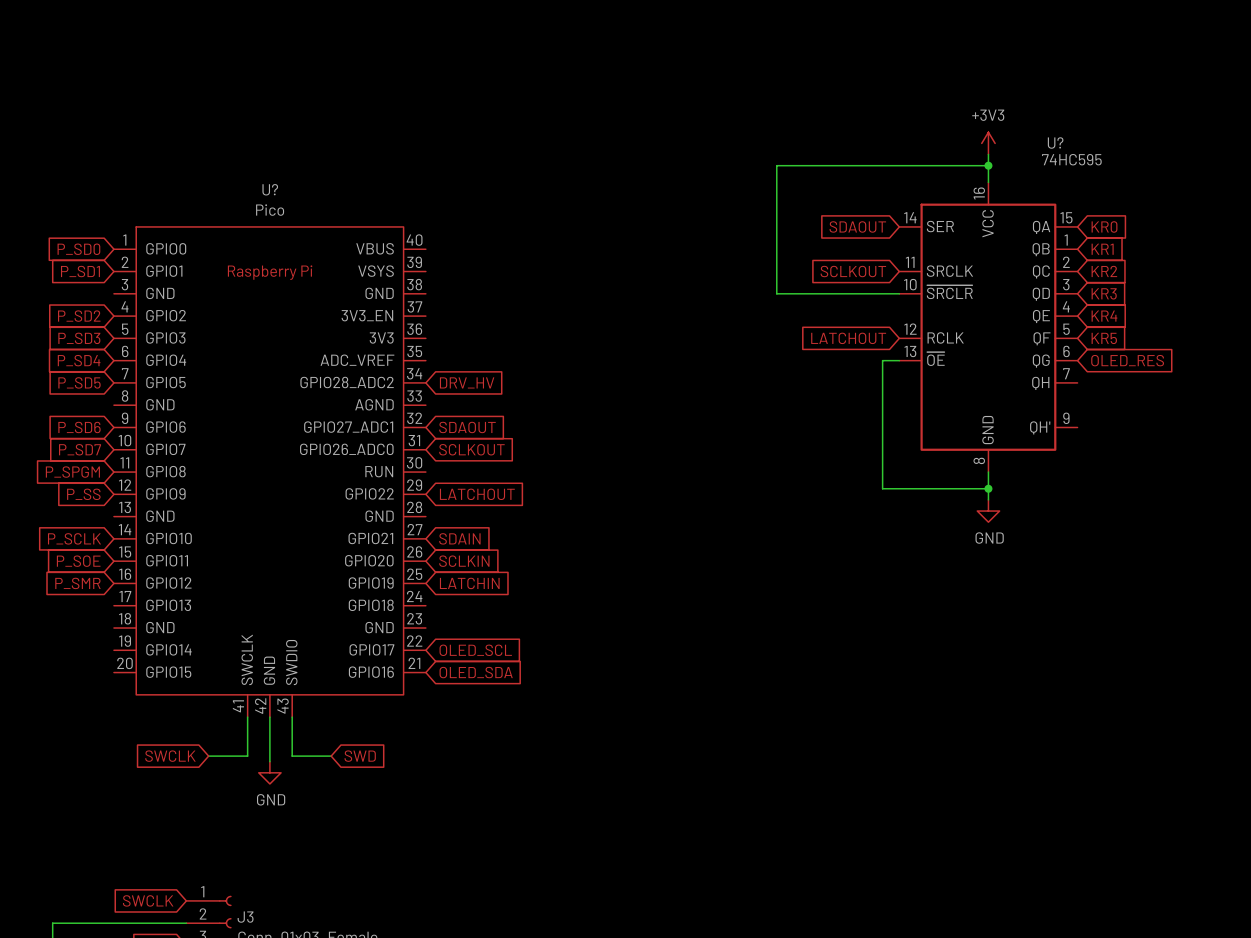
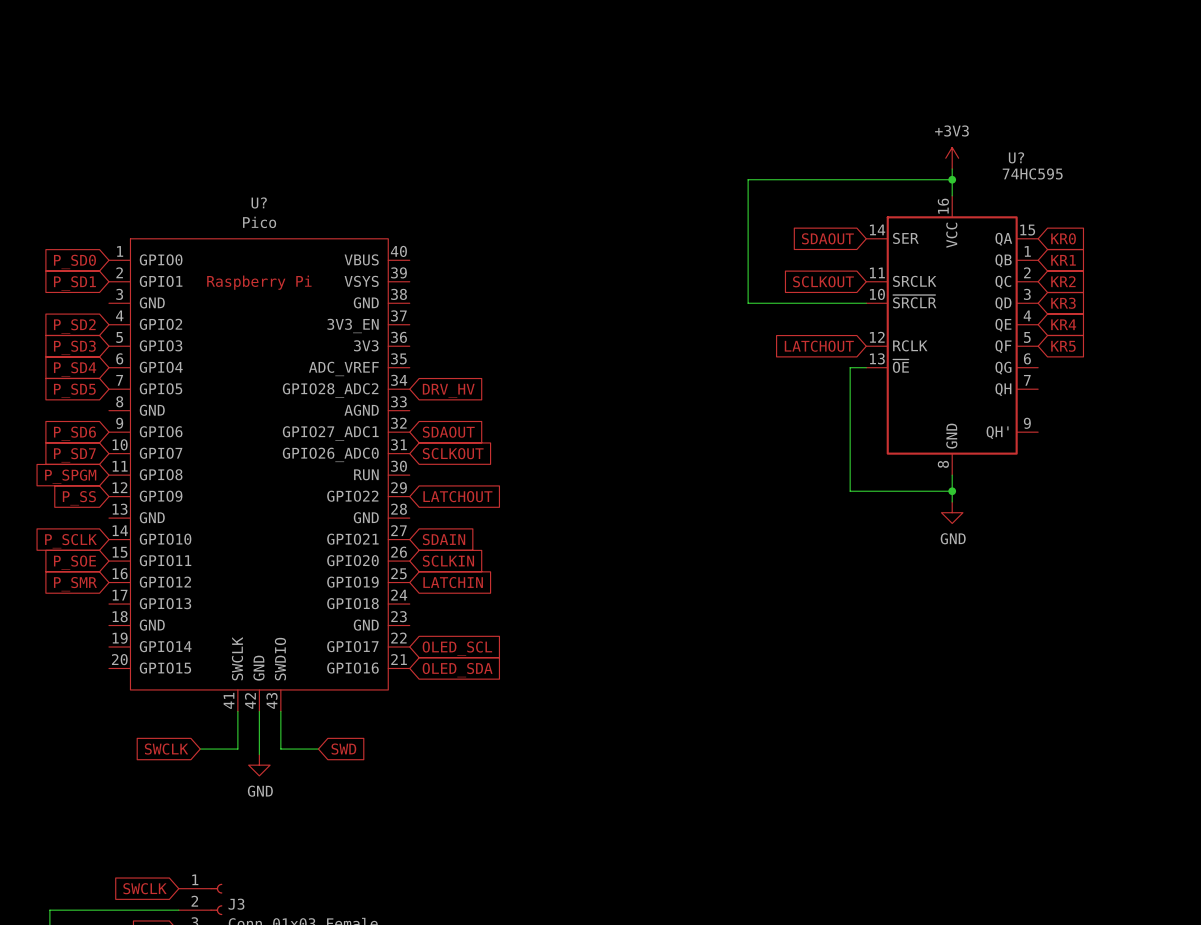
global label: OLED_RES (1127, 360) -> none

